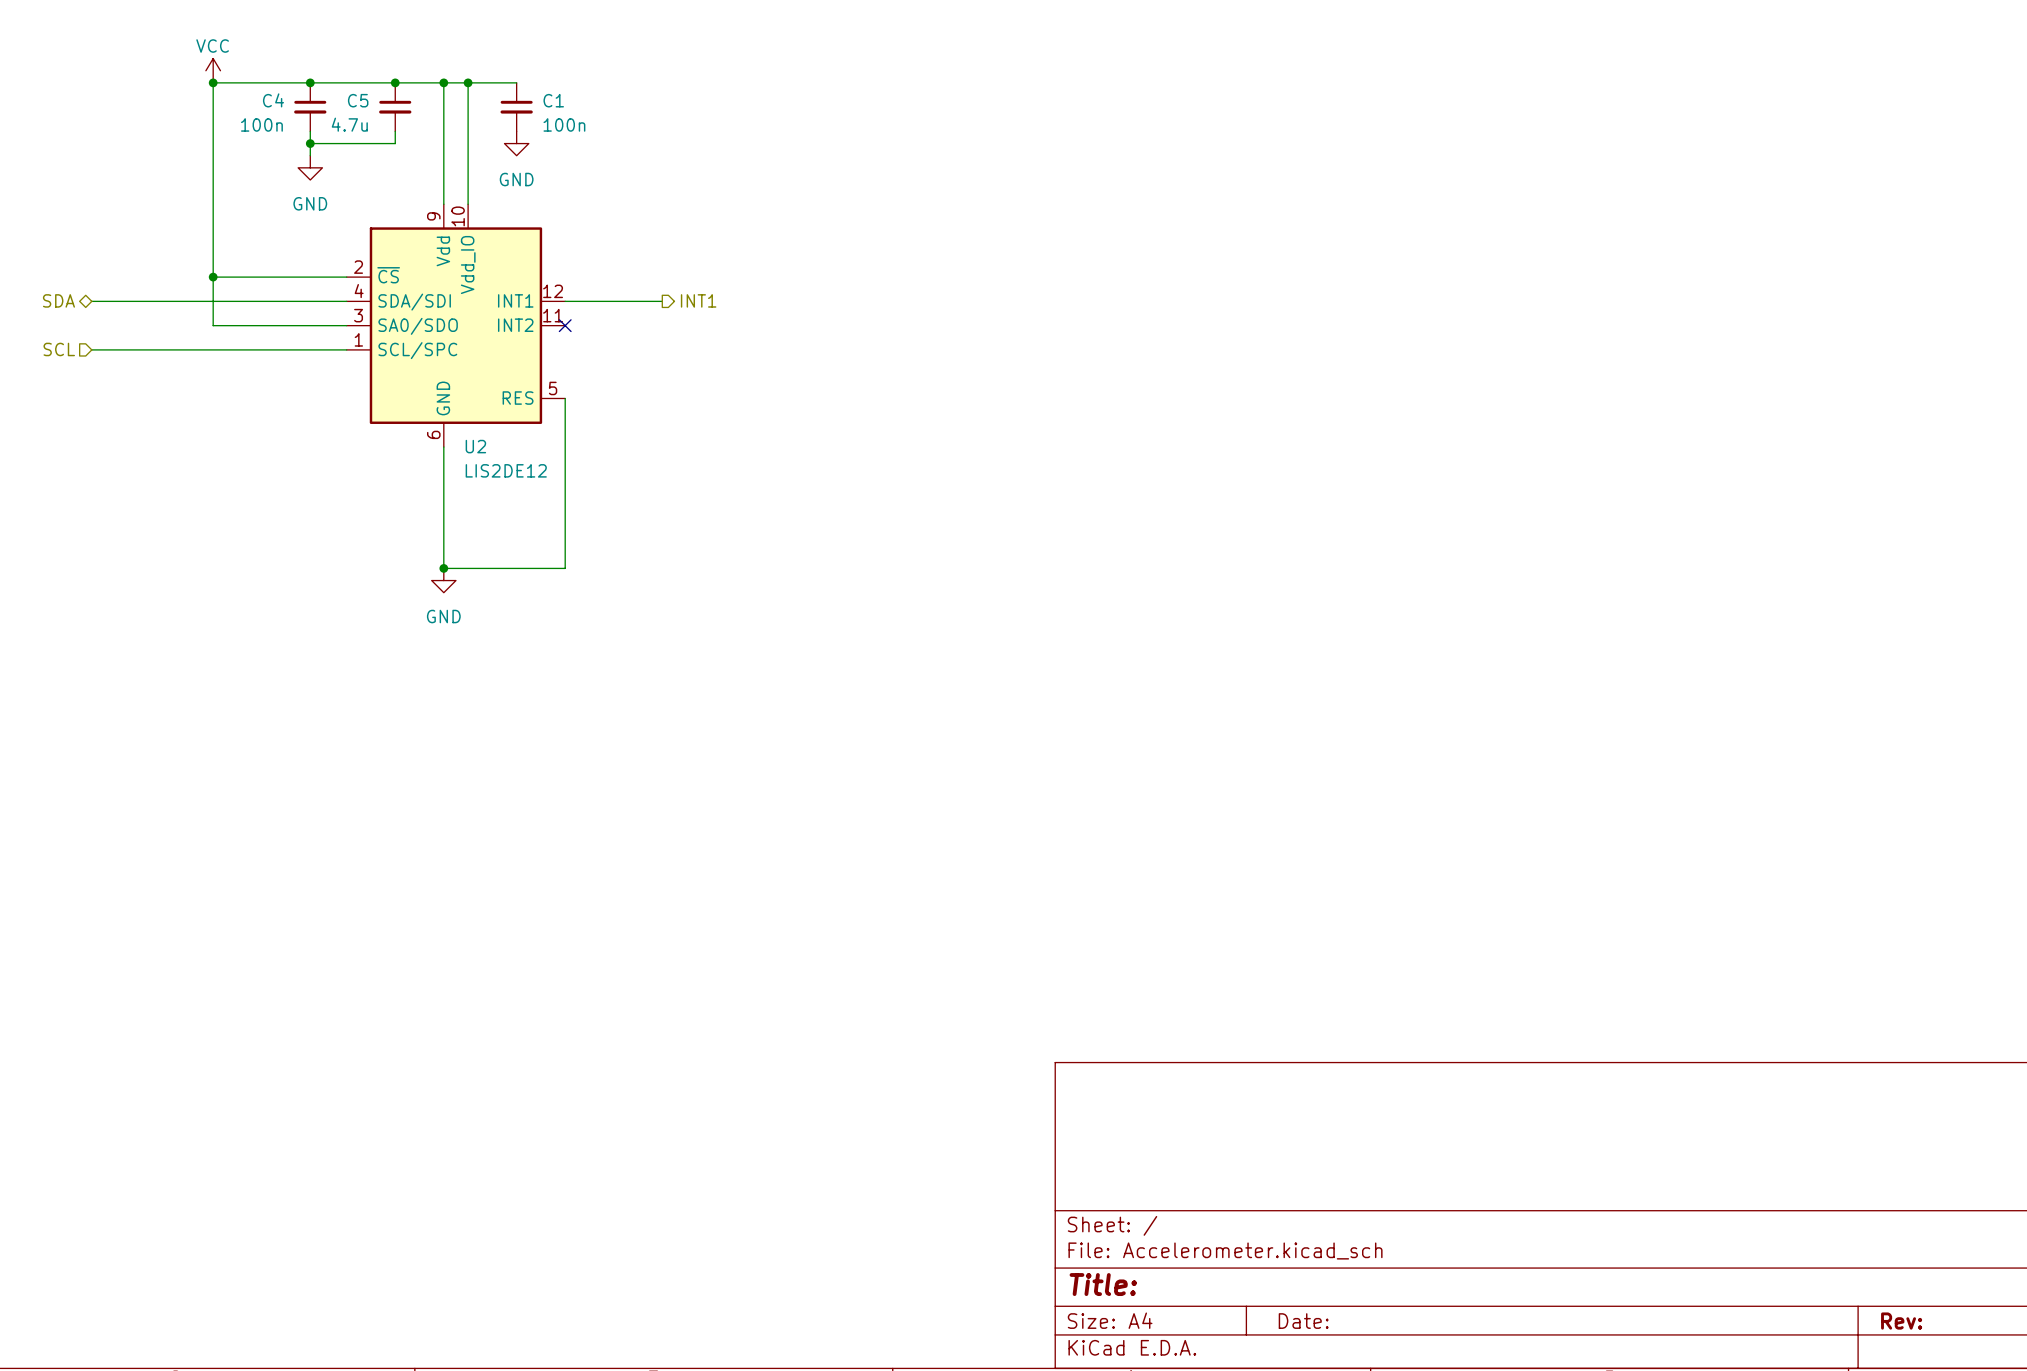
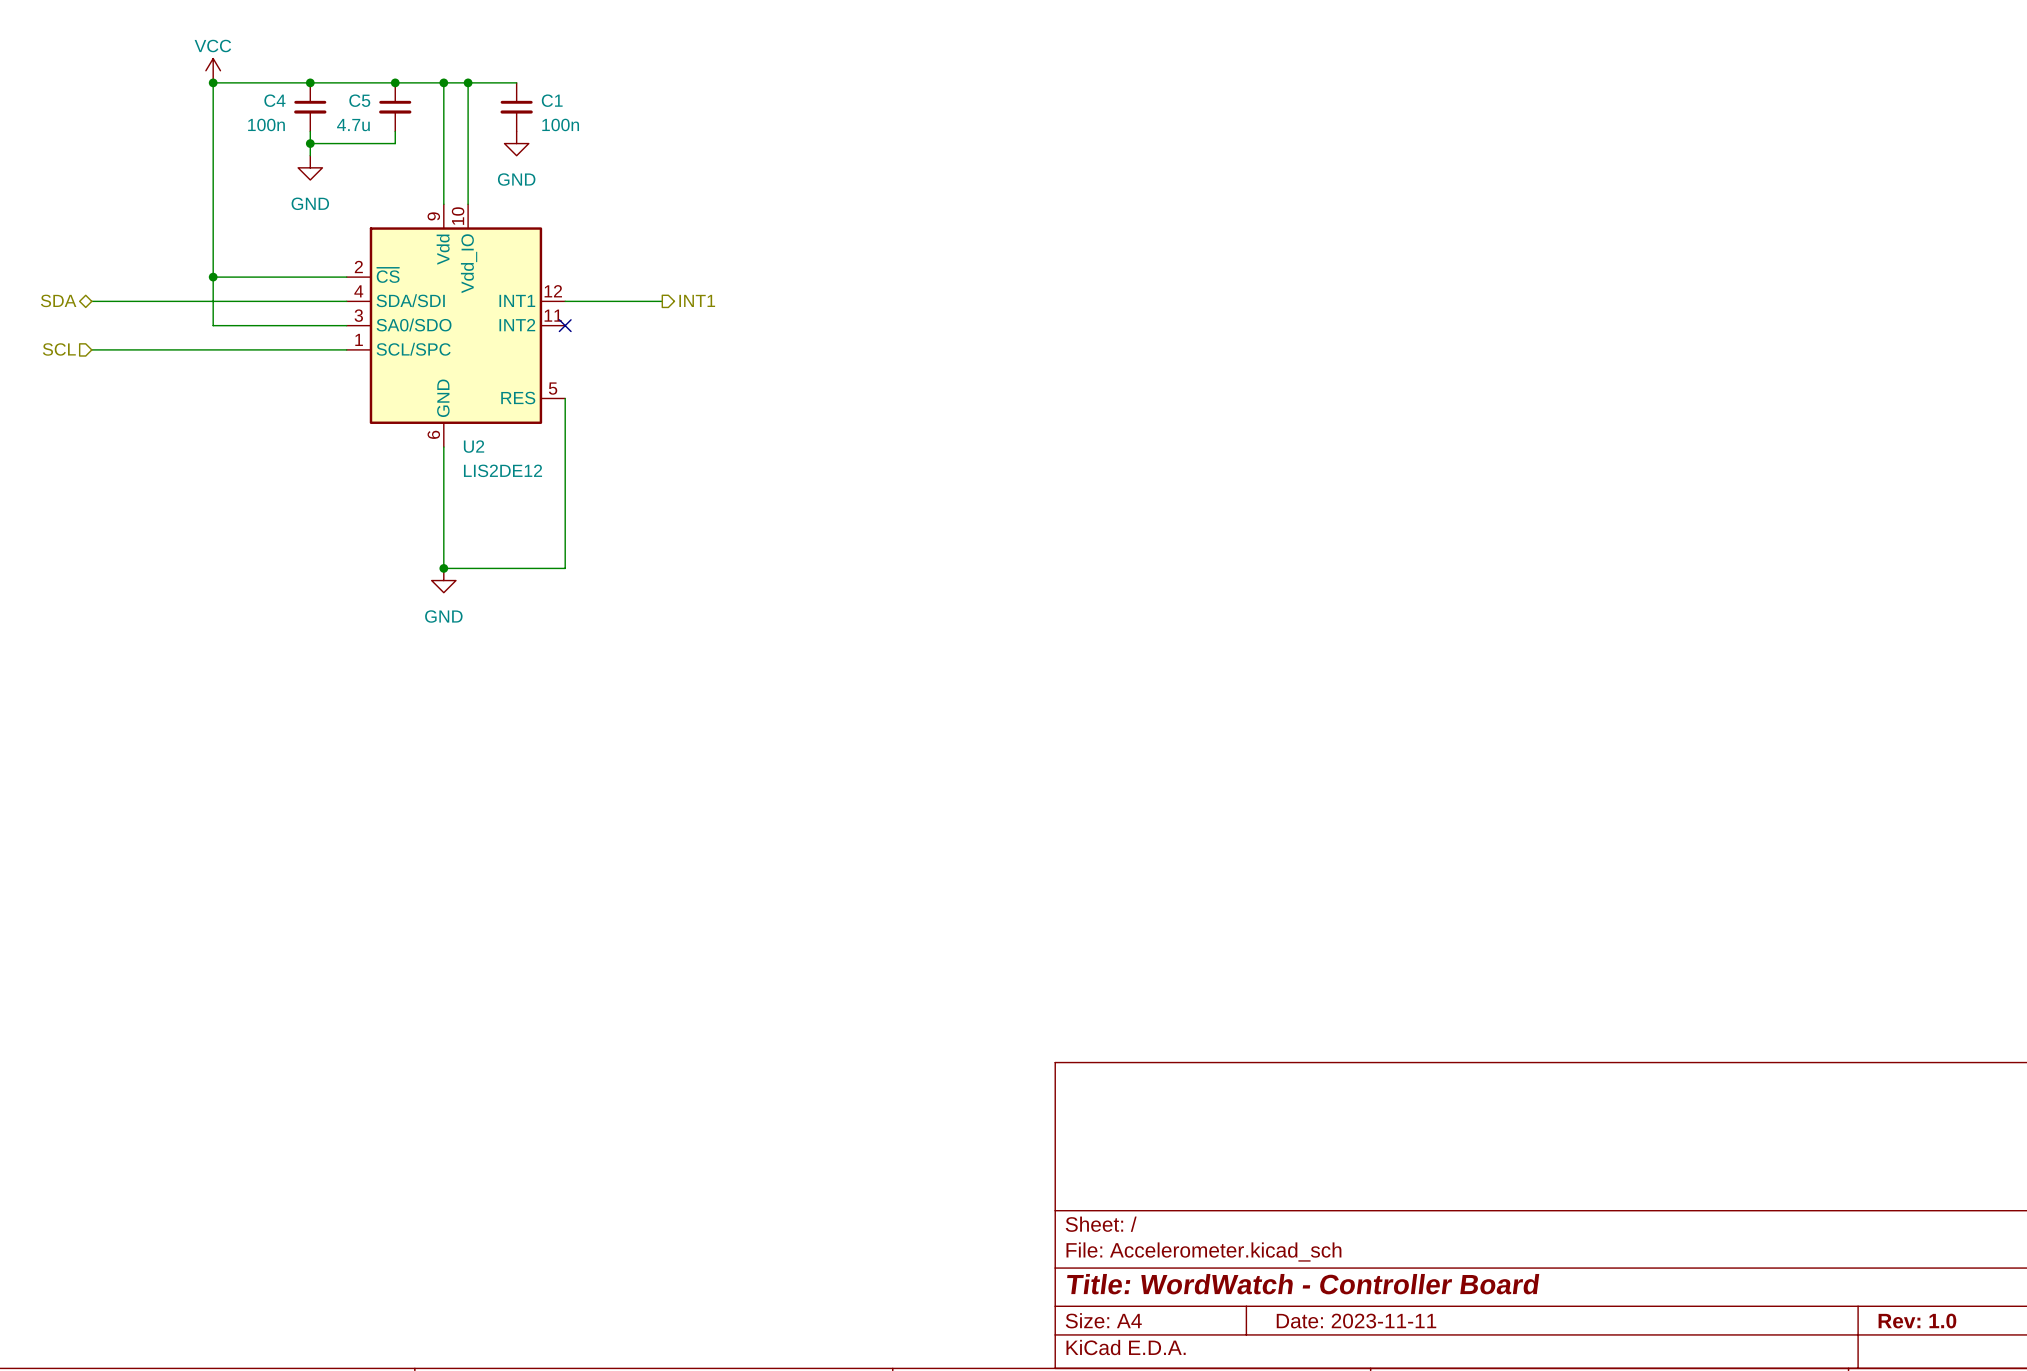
title block: Title: (1103, 1284) -> Title: WordWatch - Controller Board (1303, 1284)
title block: Date: (1303, 1321) -> Date: 2023-11-11 (1356, 1321)
title block: Rev: (1901, 1321) -> Rev: 1.0 (1917, 1321)

